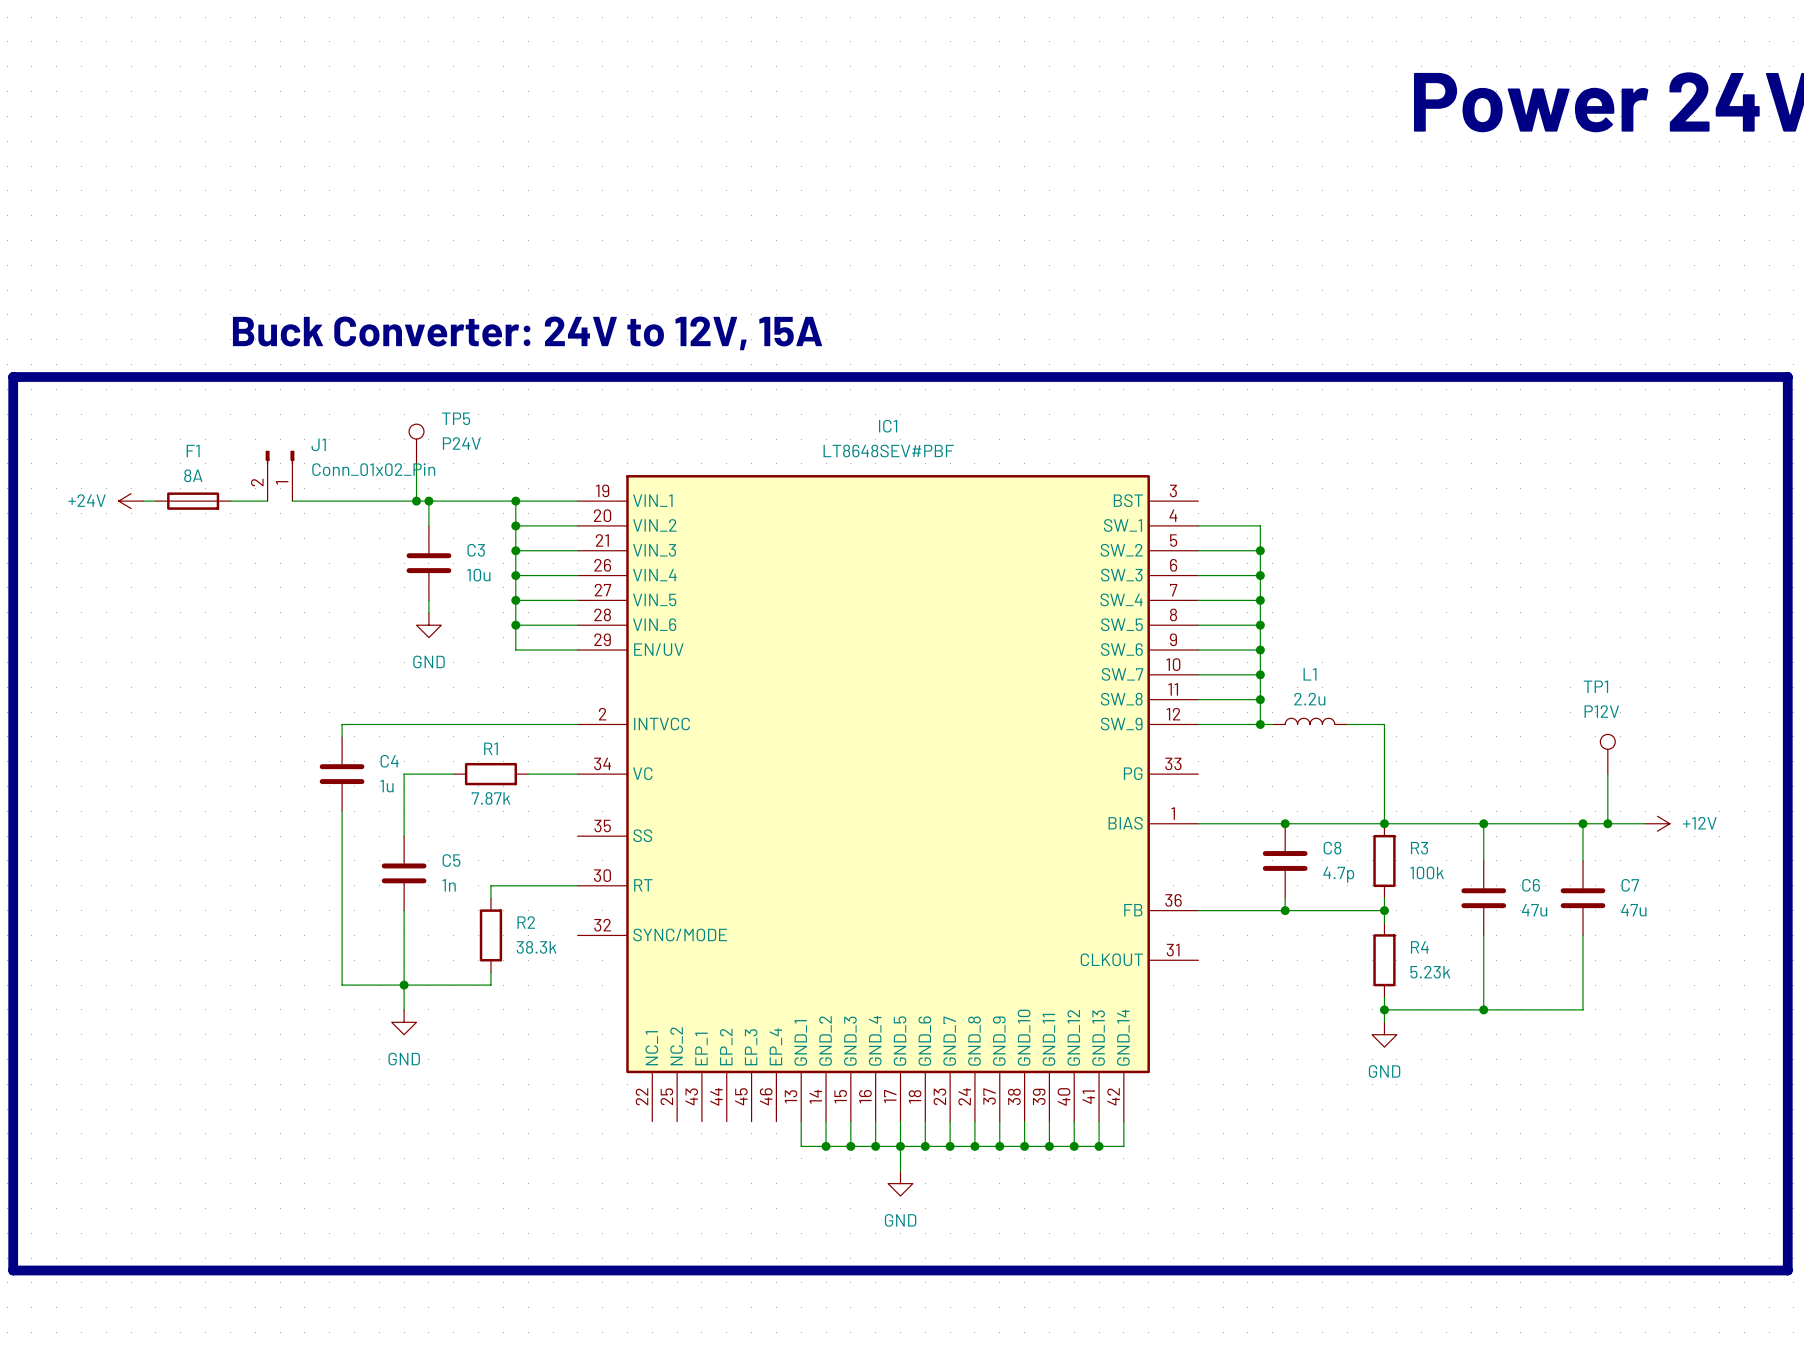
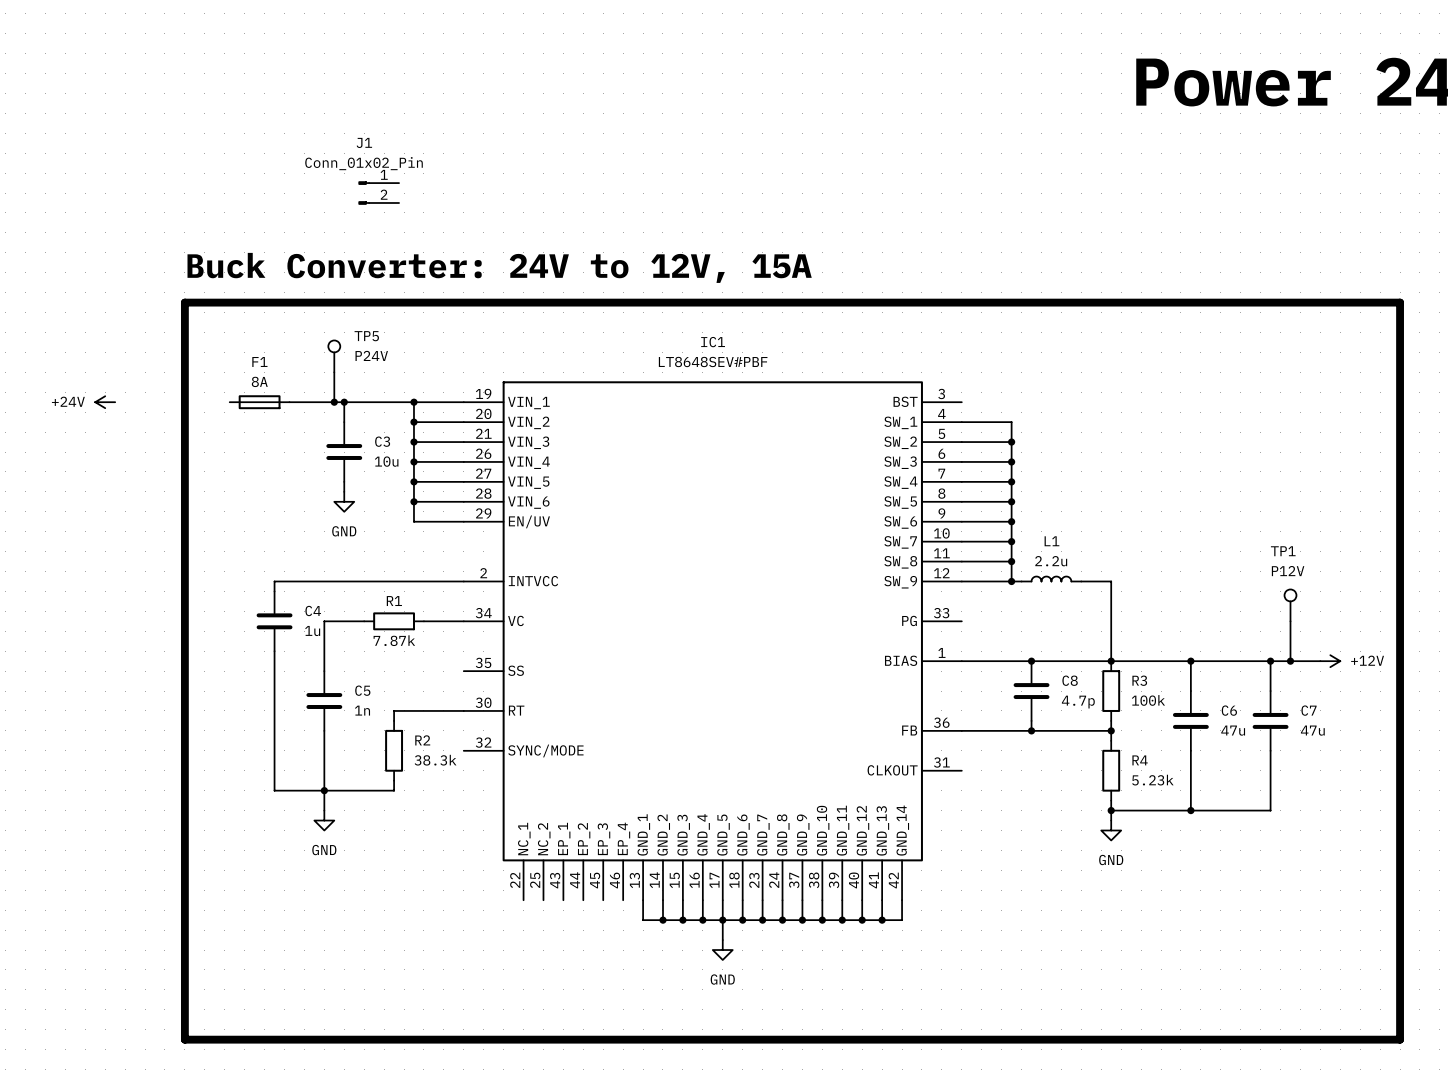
line: (230, 377) (13, 377) (13, 1270) (1787, 1270) (1787, 377) (1744, 377) -> (184, 302) (184, 1039) (1400, 1039) (1400, 302)
J1 name position: J1 (318, 444) -> J1 (364, 142)
J1 rotation: 0° (280, 457) -> 90° counterclockwise (364, 193)
J1 value position: Conn_01x02_Pin (373, 469) -> Conn_01x02_Pin (364, 163)
J1 position: (280, 475) -> (378, 193)
wire: (143, 501) (155, 501) -> none
F1 position: (193, 501) -> (259, 402)
wire: (230, 501) (267, 501) -> none

